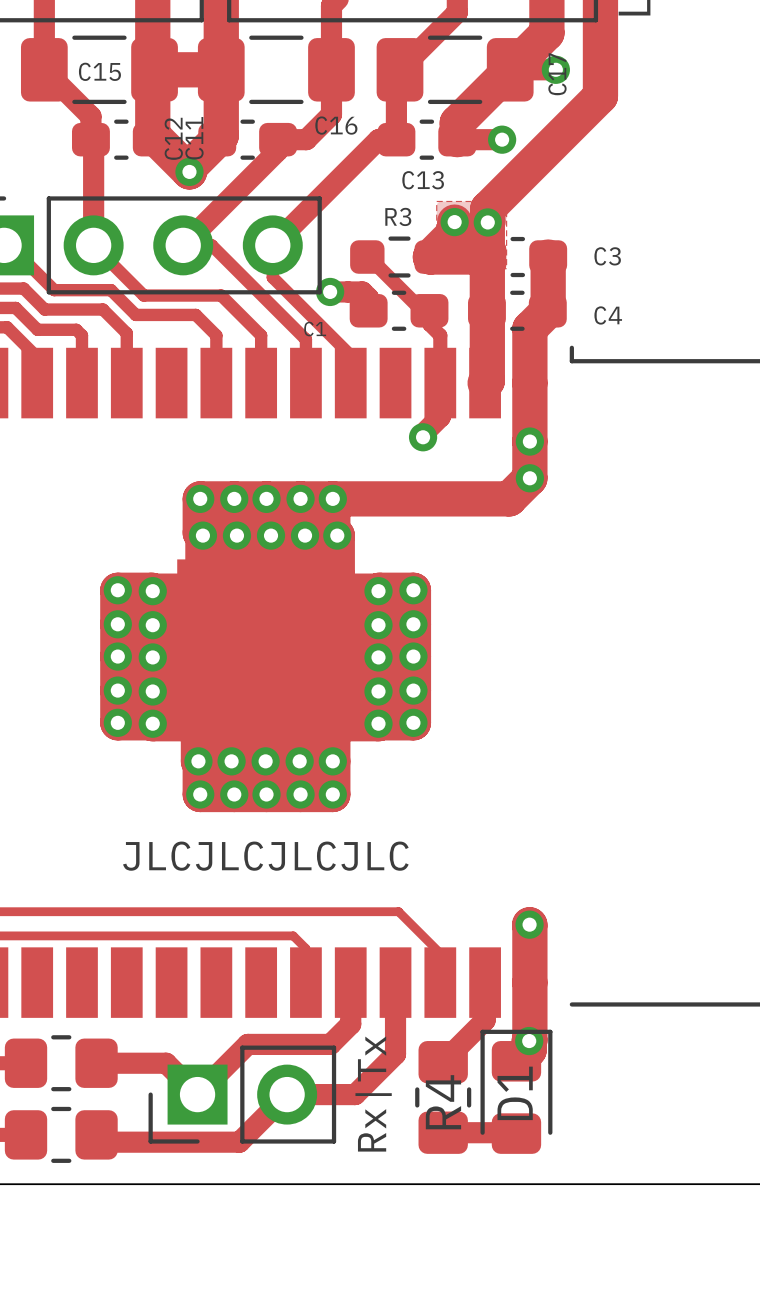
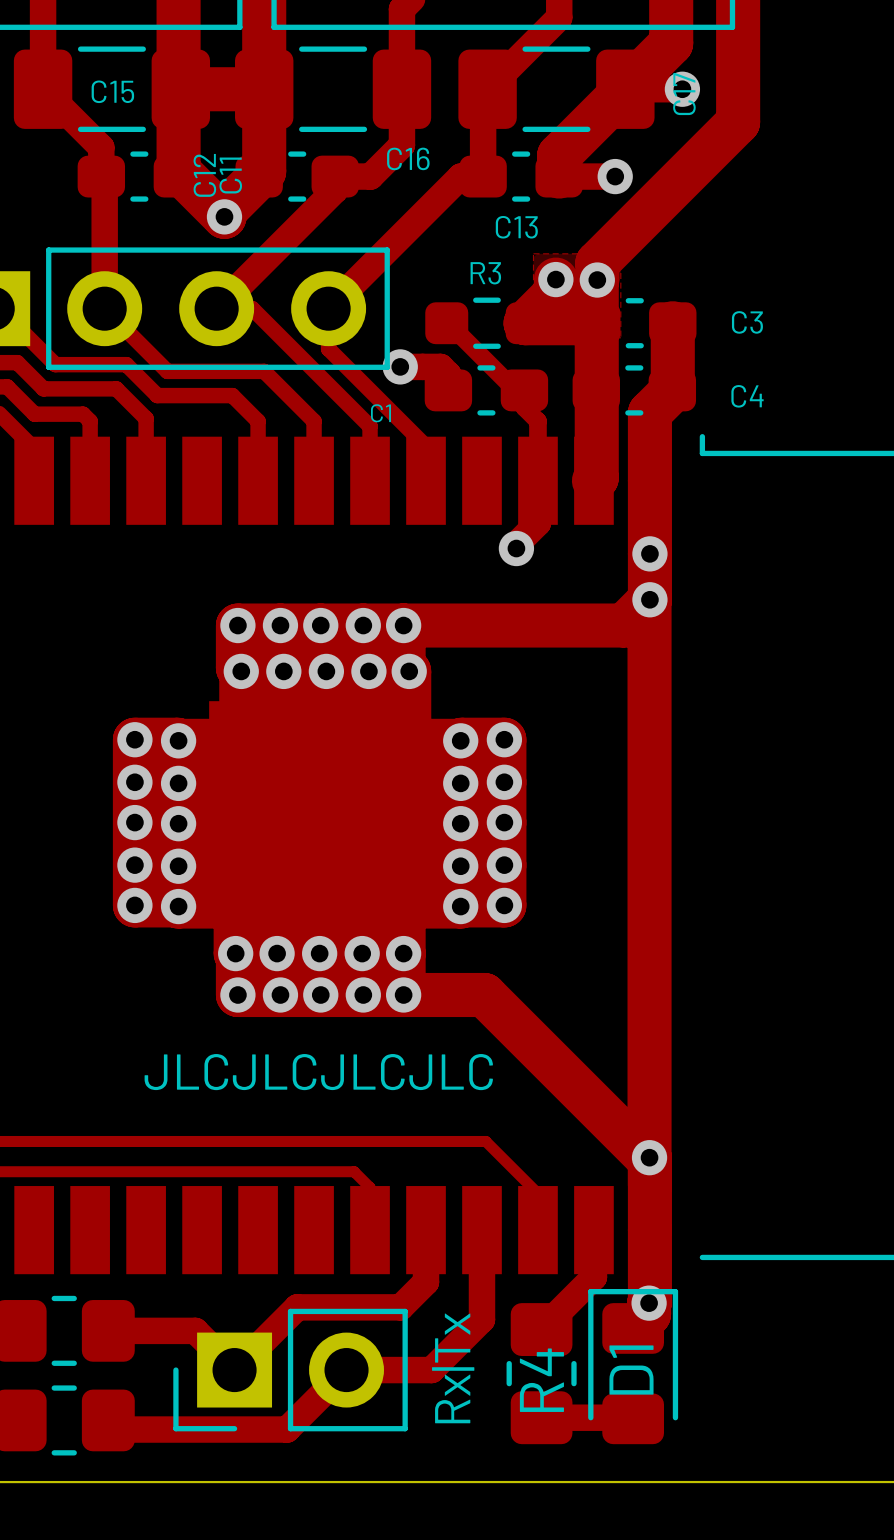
track: none -> (649, 600) (649, 1157)
track: none -> (403, 994) (484, 994) (649, 1160)

